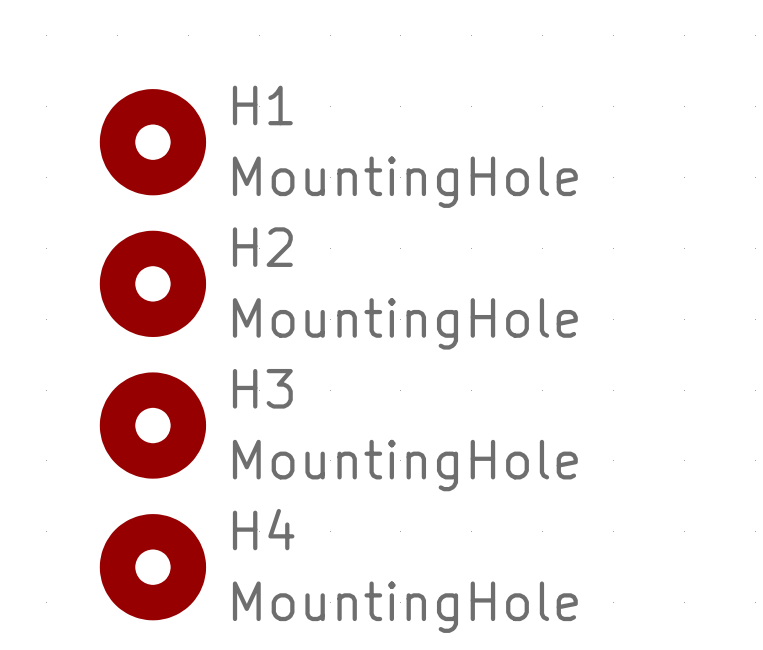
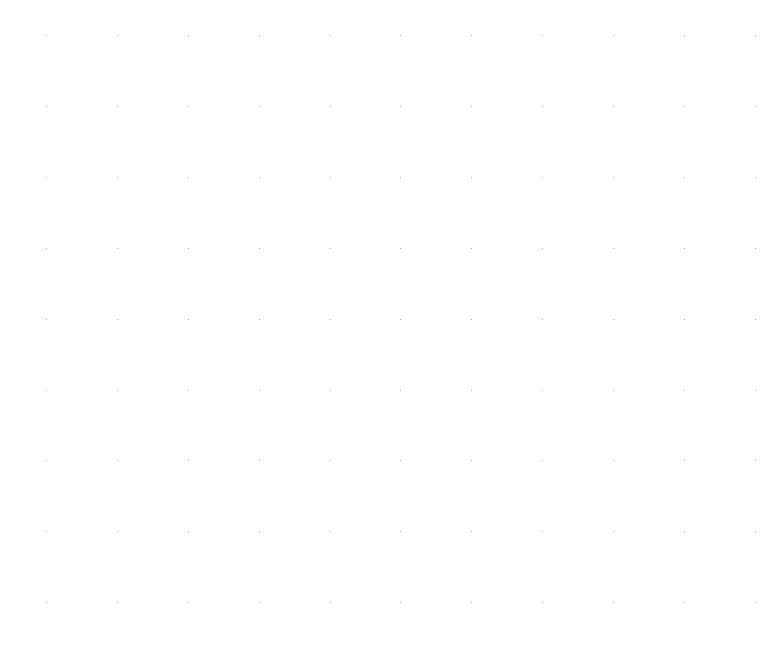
H1: MountingHole (152, 142) -> none
H2: MountingHole (152, 283) -> none
H3: MountingHole (152, 425) -> none
H4: MountingHole (152, 567) -> none

